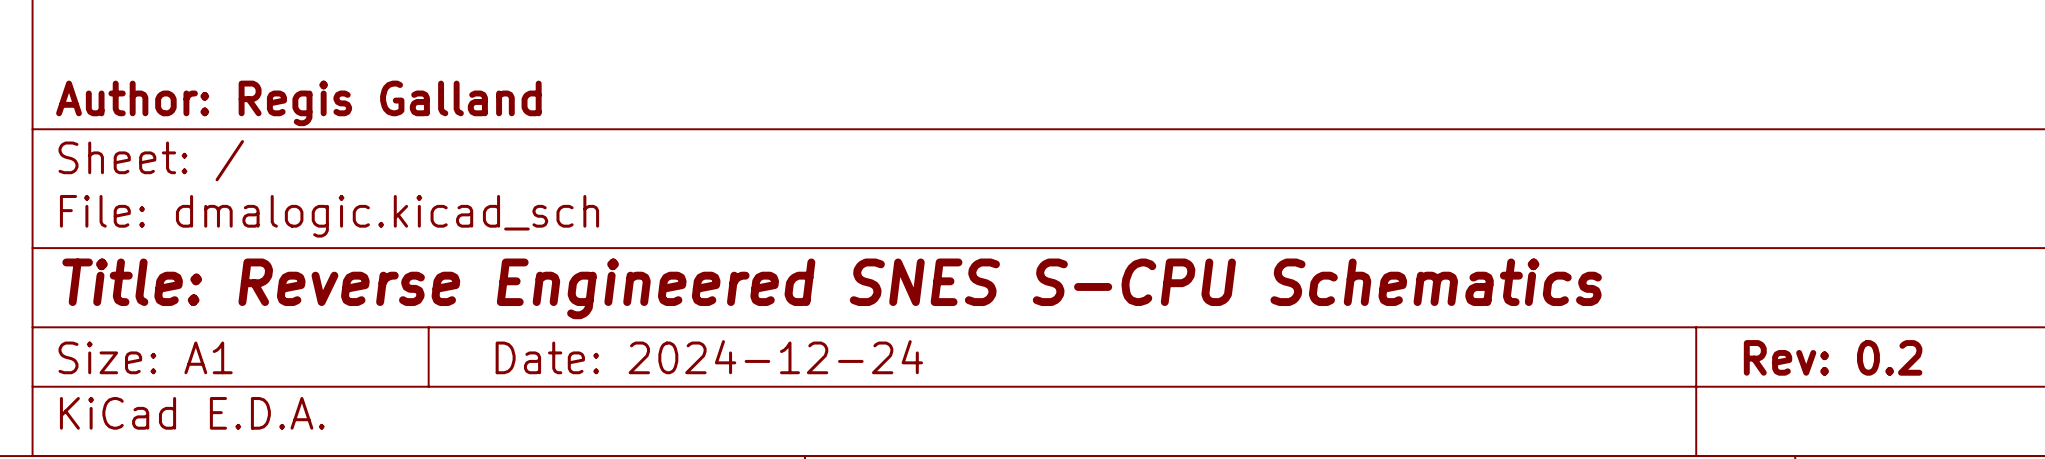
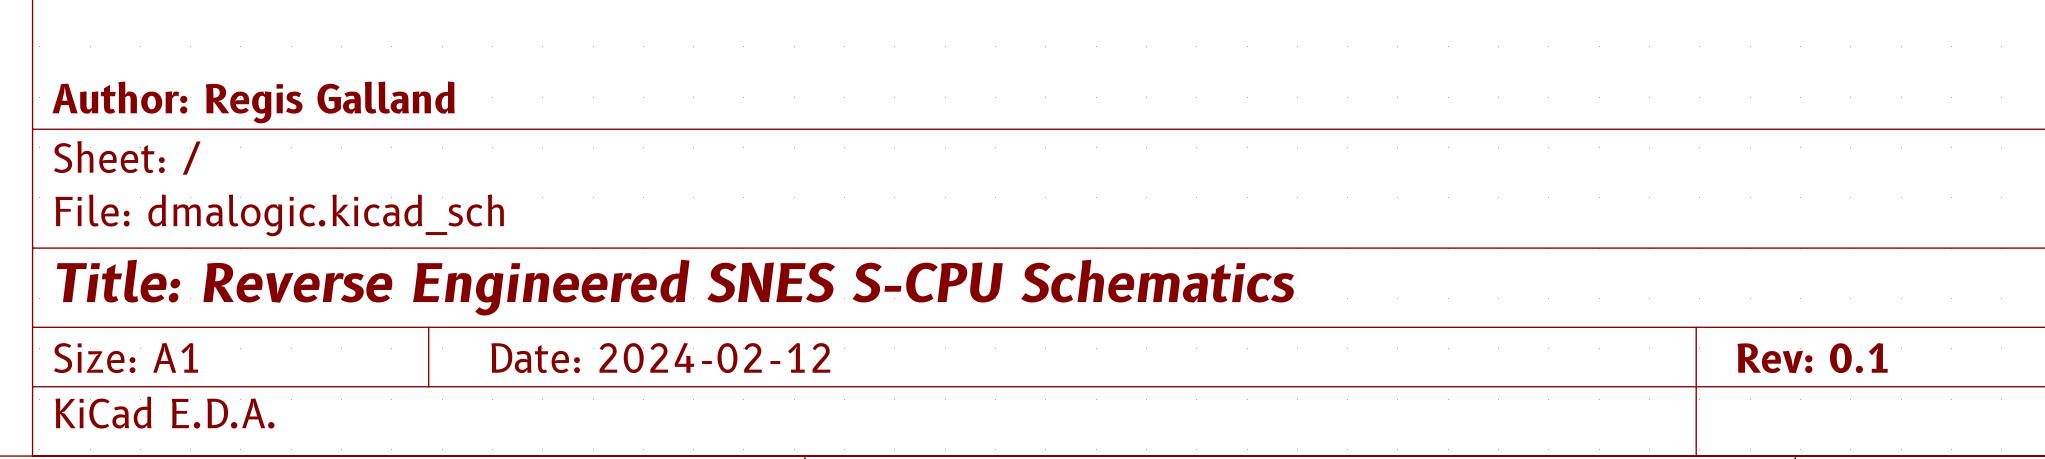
title block: Date: 2024-12-24 (709, 357) -> Date: 2024-02-12 (660, 358)
title block: Rev: 0.2 (1833, 357) -> Rev: 0.1 (1812, 358)

